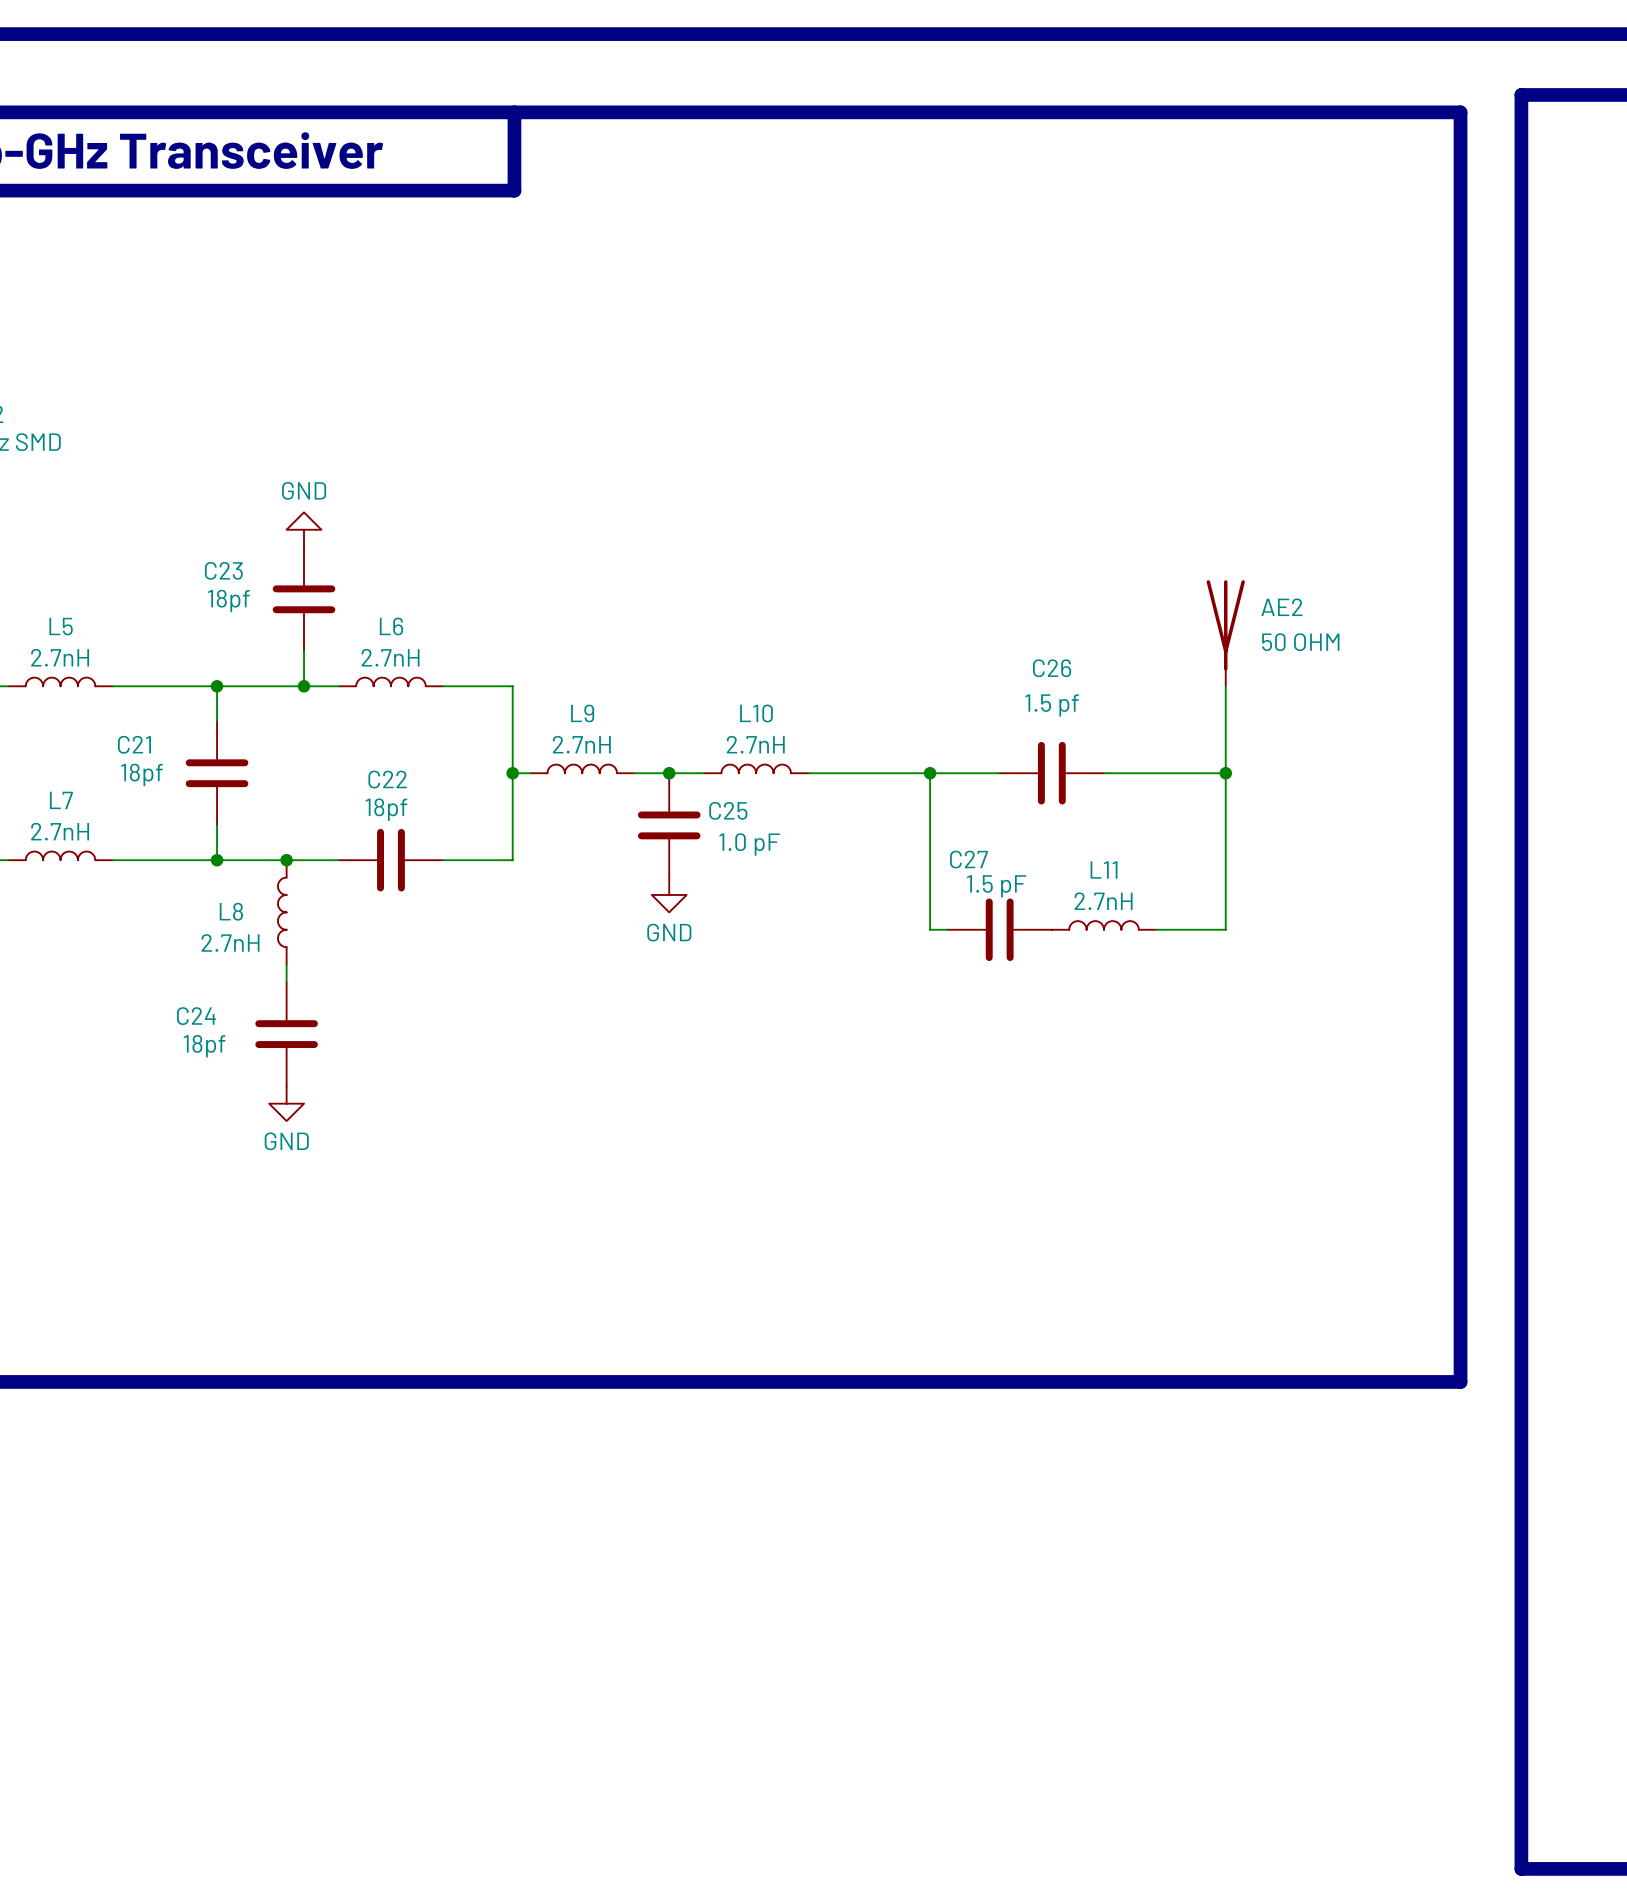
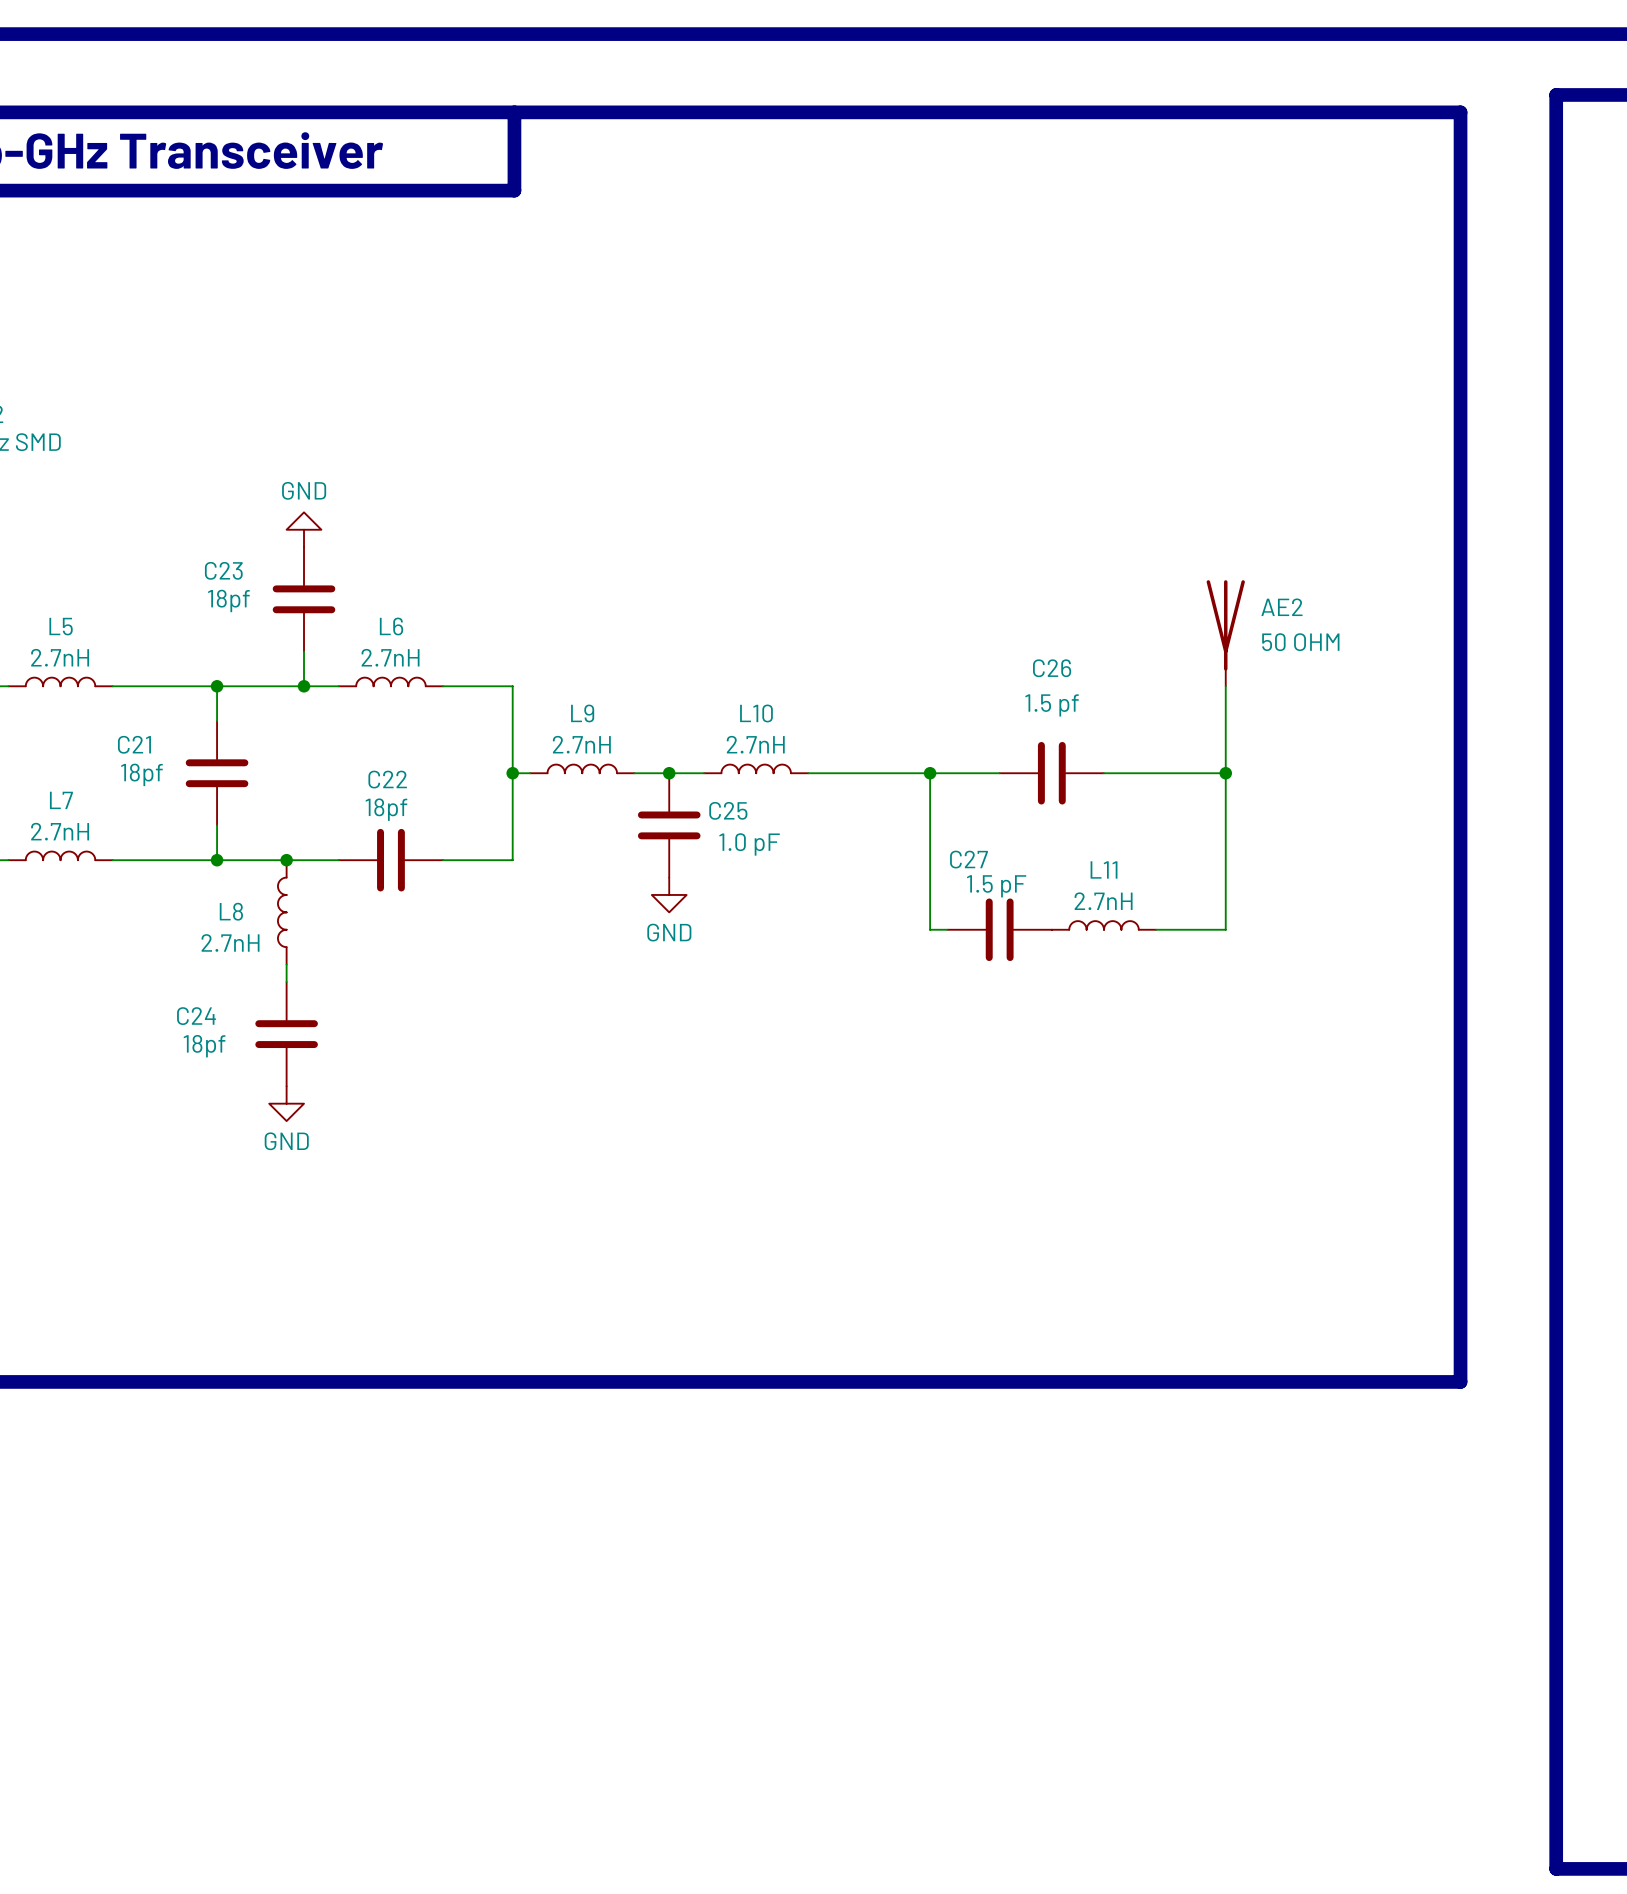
line: (1556, 94) (1521, 94) (1521, 1868) (1556, 1868) -> (1556, 94) (1556, 1868)

